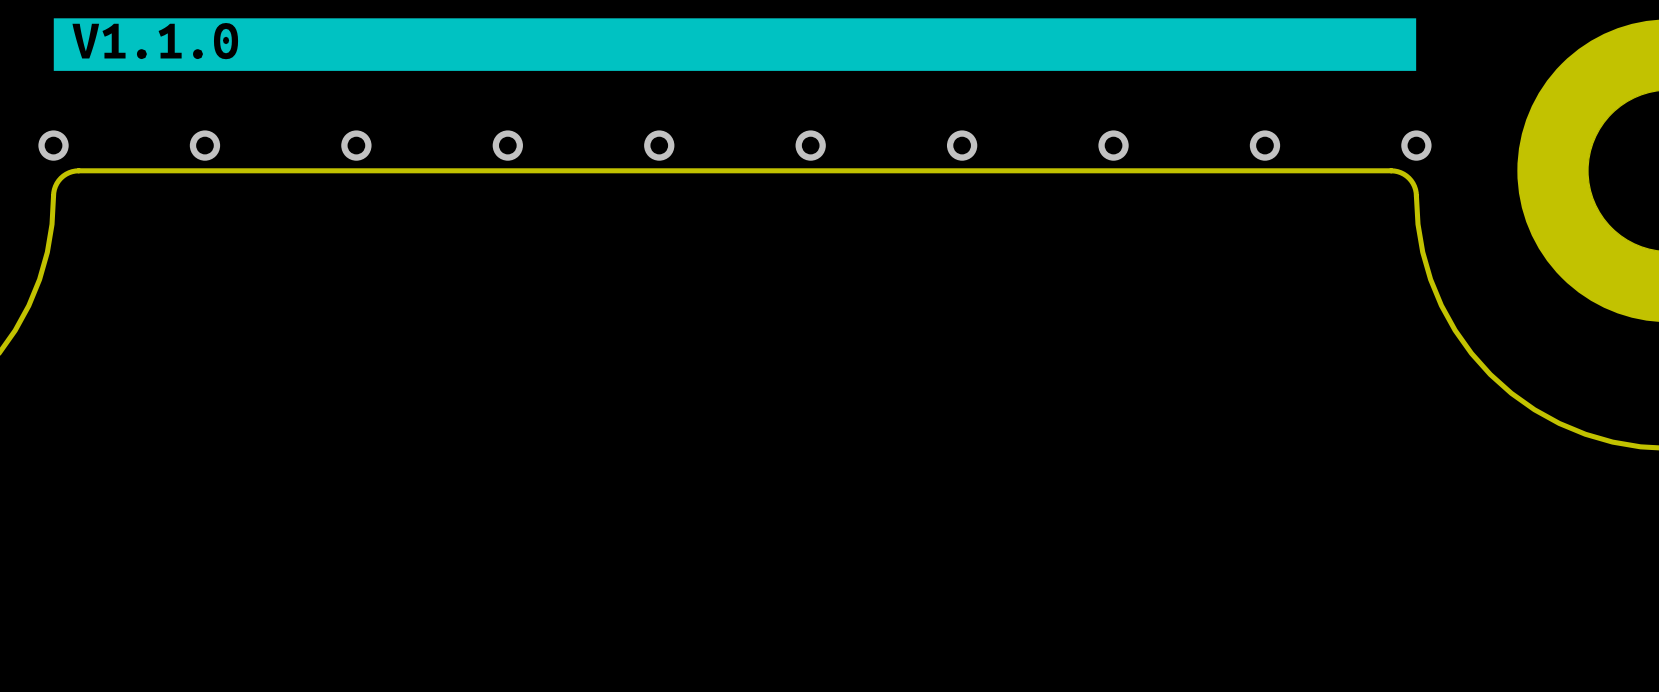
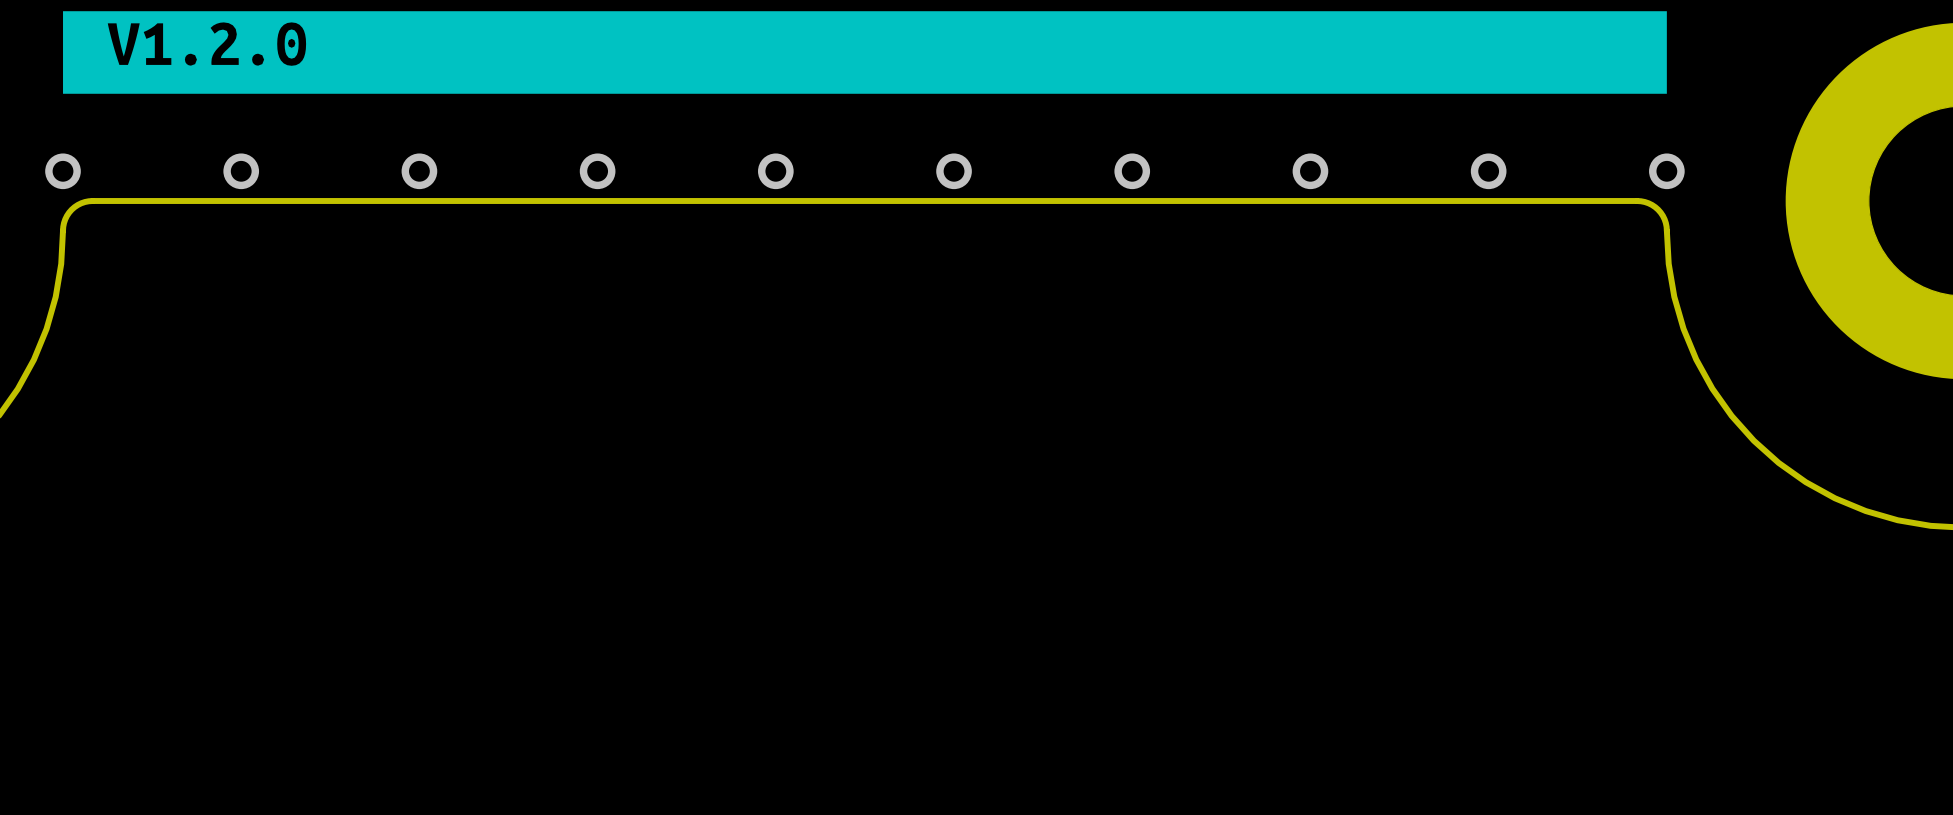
drawing shape: [53, 18, 1417, 71] -> [63, 11, 1667, 94]

